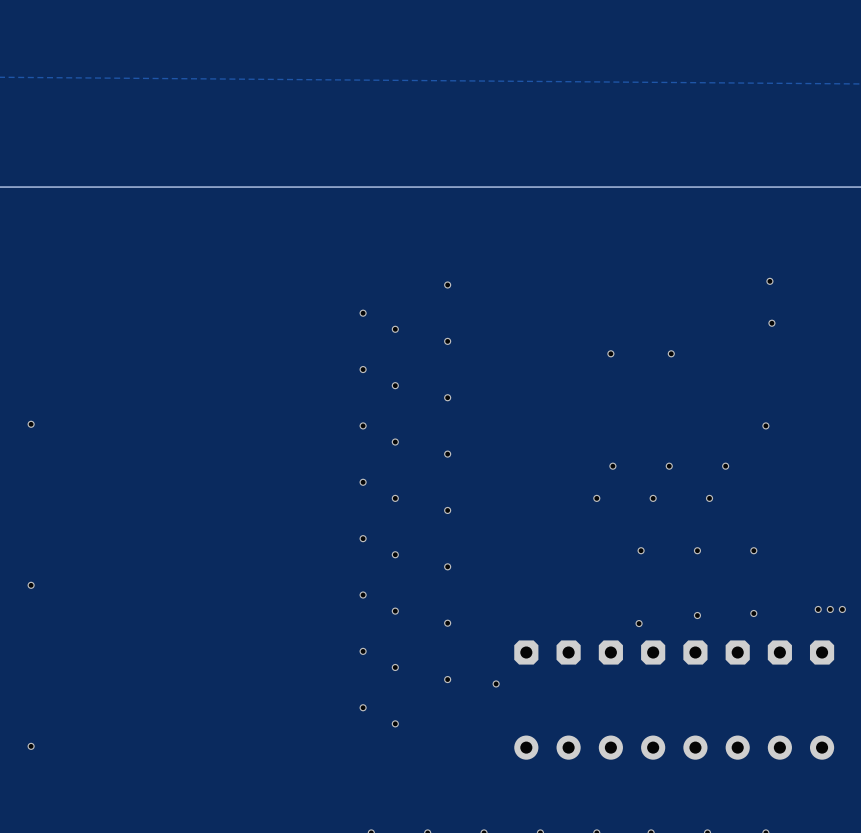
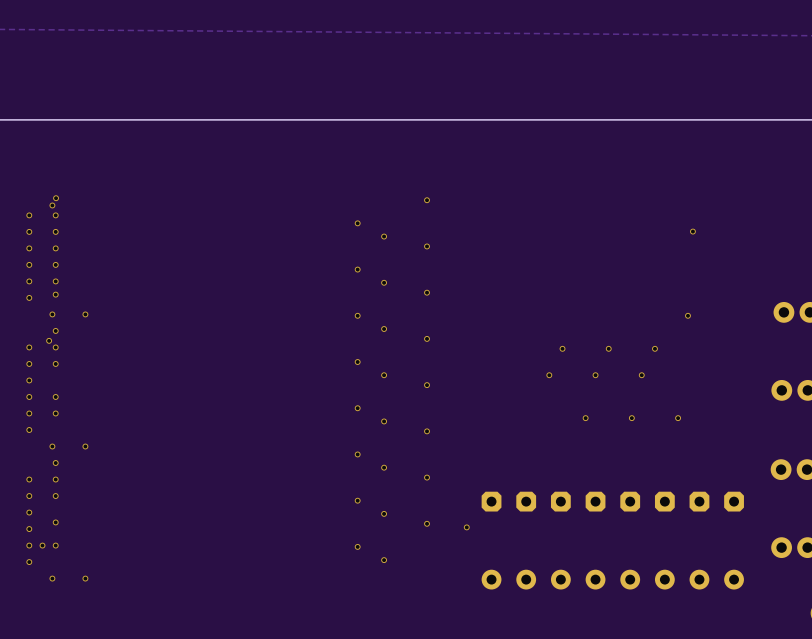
via: (769, 281) -> none
via: (610, 353) -> none
via: (671, 353) -> none
via: (818, 609) -> none
via: (830, 609) -> none
via: (842, 609) -> none
via: (753, 613) -> none
via: (697, 615) -> none
via: (639, 623) -> none

